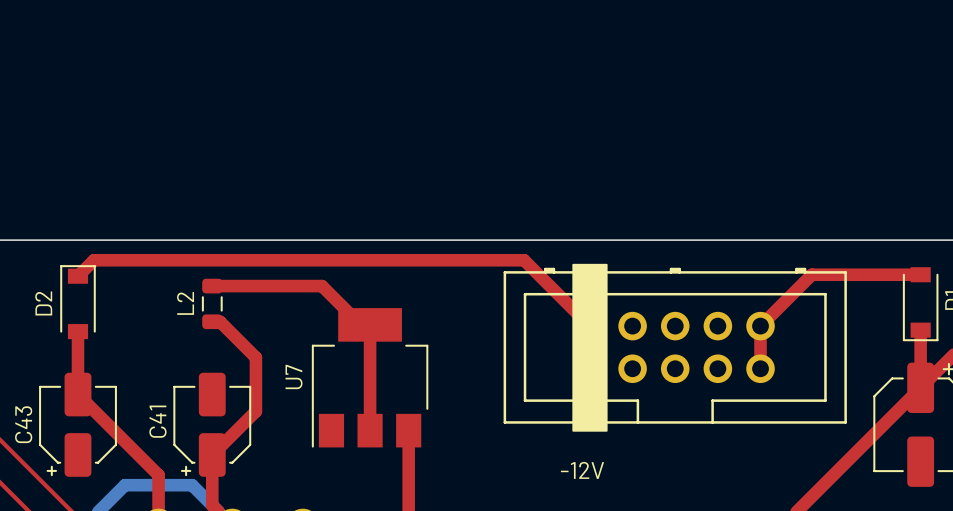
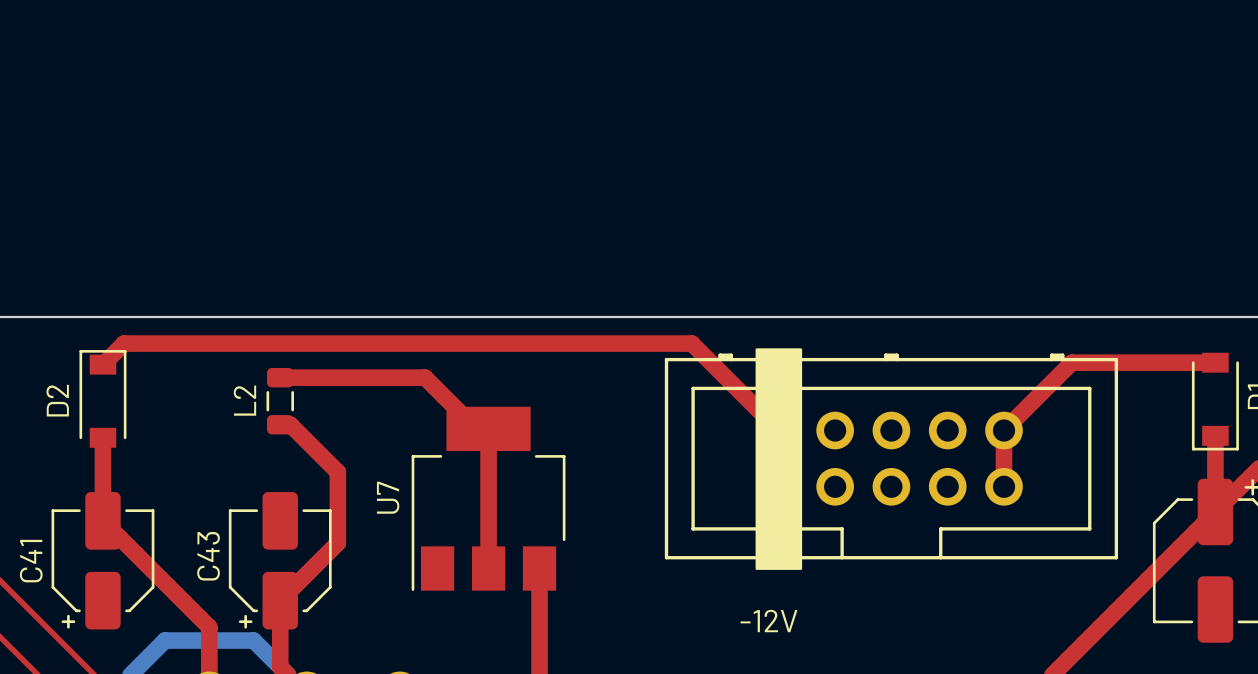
C41 name: C41 (157, 421) -> C43 (208, 556)
C43 name: C43 (23, 424) -> C41 (31, 561)

